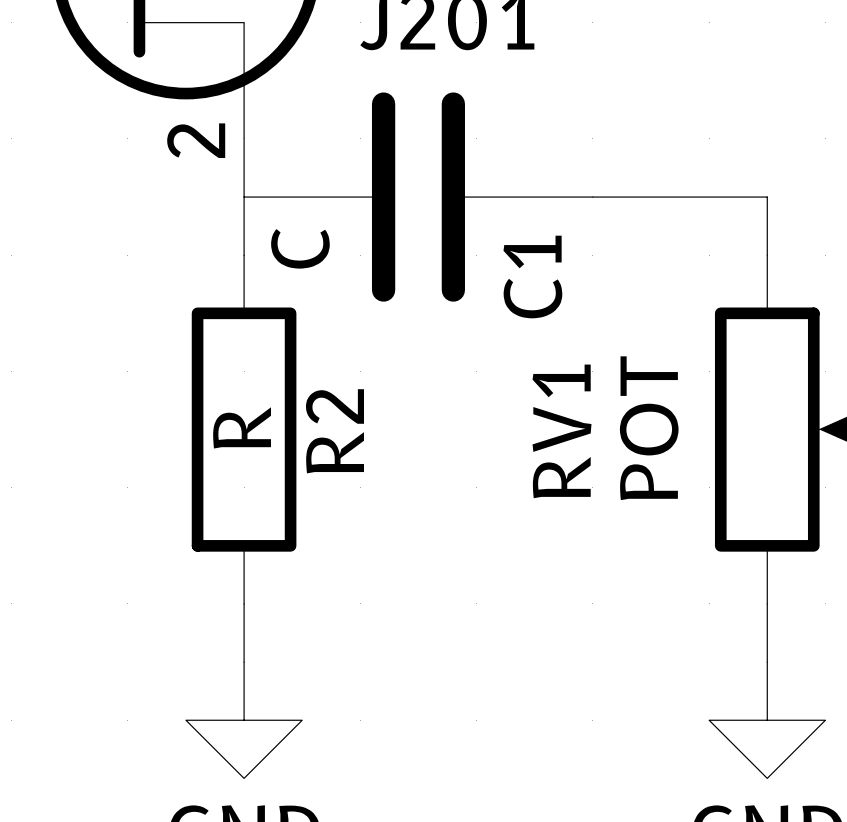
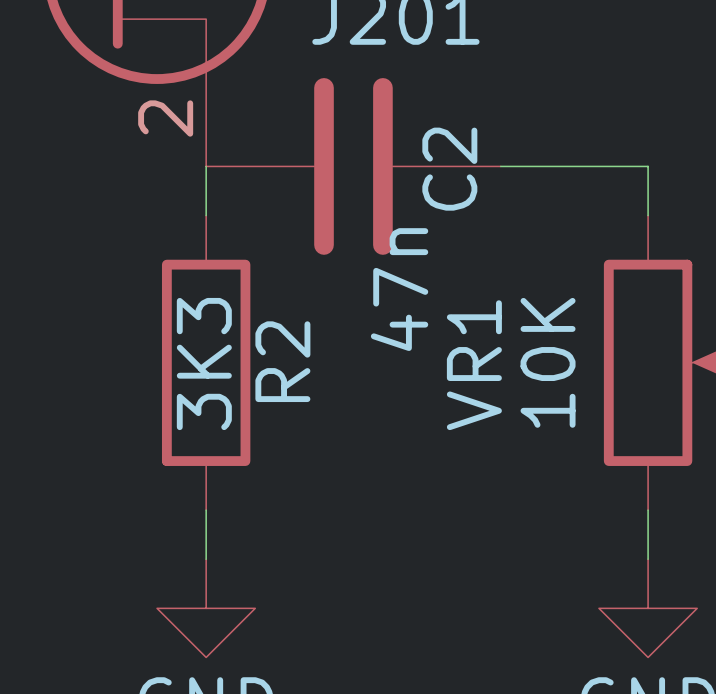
C1 value: C (300, 248) -> 47n (399, 289)
C1 name: C1 (532, 277) -> C2 (449, 169)
R2 value: R (242, 427) -> 3K3 (204, 364)
RV1 value: POT (649, 428) -> 10K (548, 362)
RV1 name: RV1 (562, 431) -> VR1 (474, 365)

